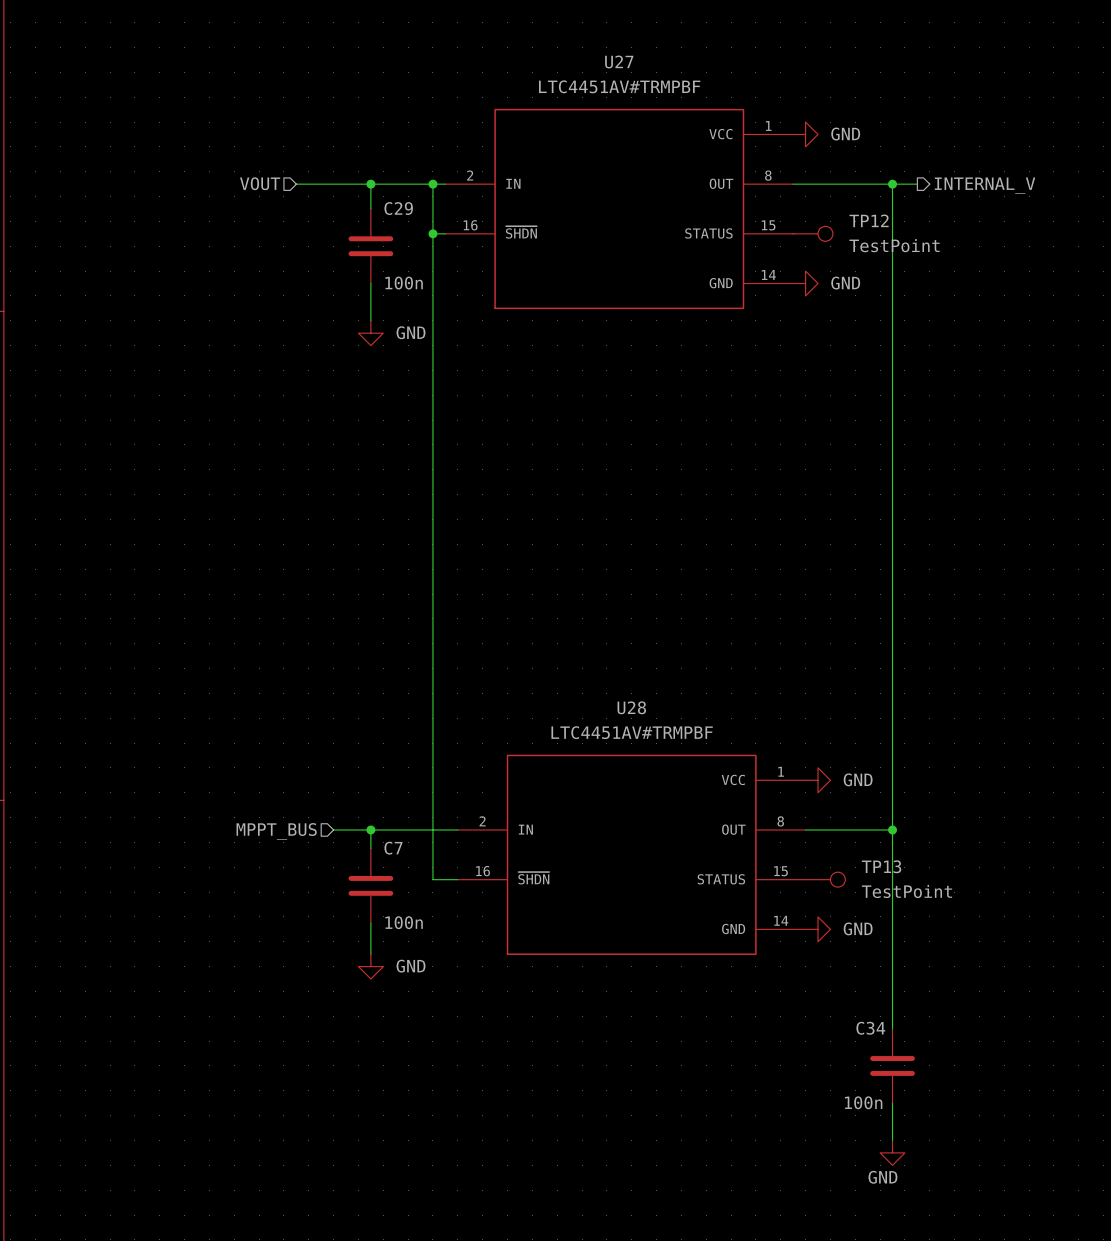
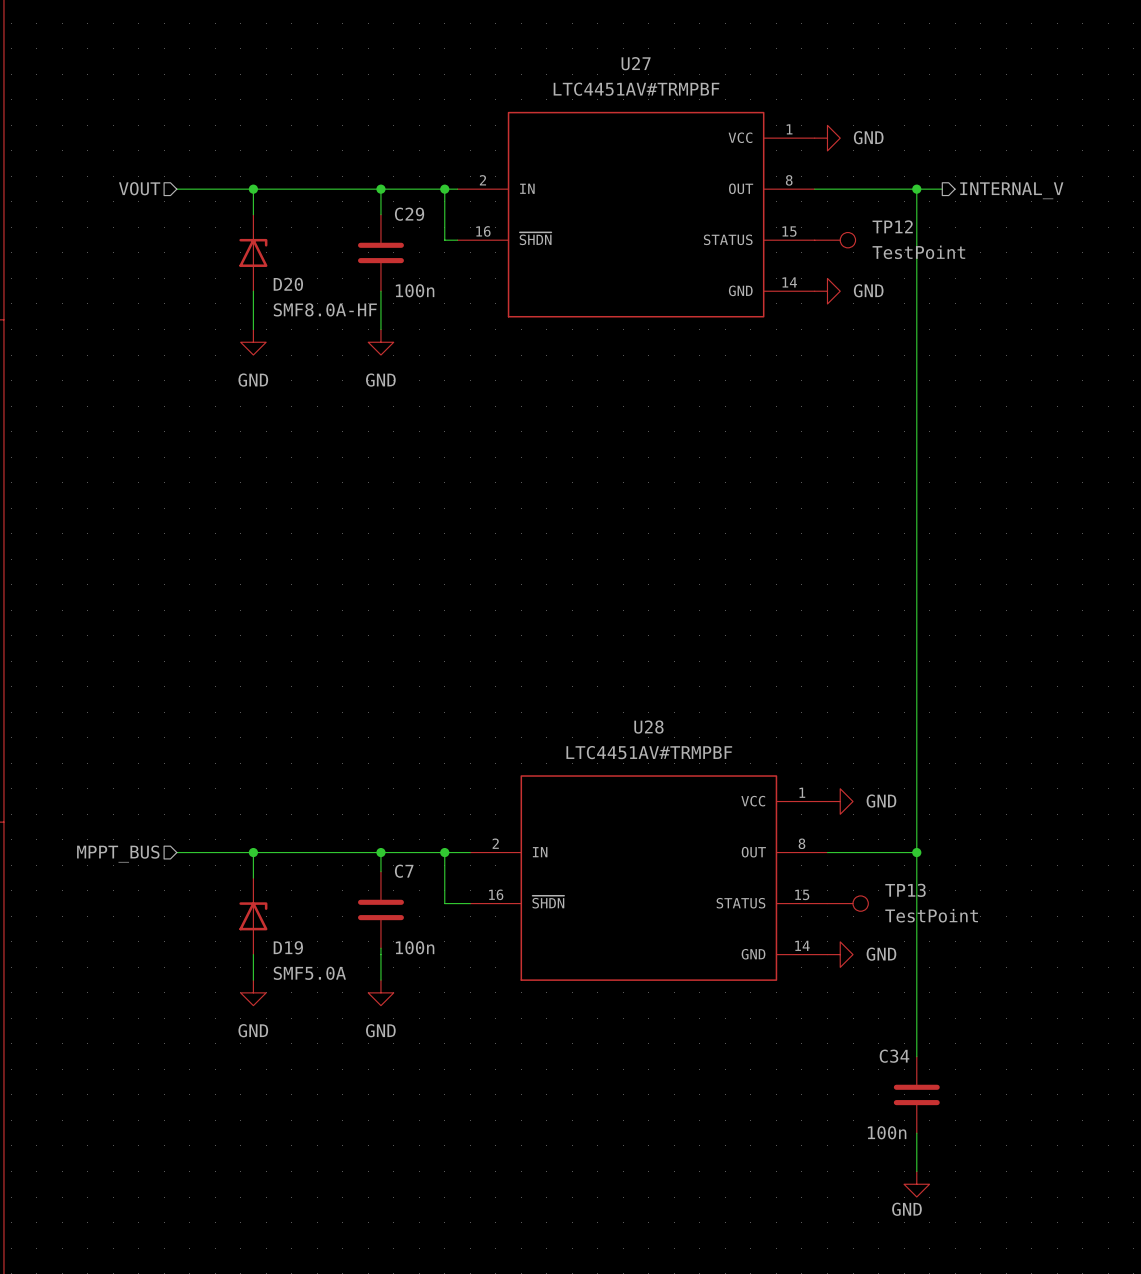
hierarchical label position: VOUT (260, 183) -> VOUT (139, 188)
wire: none -> (176, 189) (304, 189)
wire: none -> (253, 189) (253, 214)
junction: none -> (253, 189)
wire: (432, 233) (432, 829) -> none
junction: (432, 233) -> none
D20: none -> SMF8.0A-HF (253, 252)
wire: none -> (253, 291) (253, 329)
power symbol text position: GND (411, 332) -> GND (380, 380)
power symbol: none -> GND (253, 342)
wire: none -> (176, 852) (342, 852)
wire: none -> (253, 852) (253, 878)
junction: none -> (253, 852)
junction: none -> (444, 852)
hierarchical label position: MPPT_BUS (276, 831) -> MPPT_BUS (118, 854)
D19: none -> SMF5.0A (253, 916)
wire: none -> (253, 954) (253, 980)
power symbol: none -> GND (253, 992)
power symbol text position: GND (411, 966) -> GND (380, 1030)

